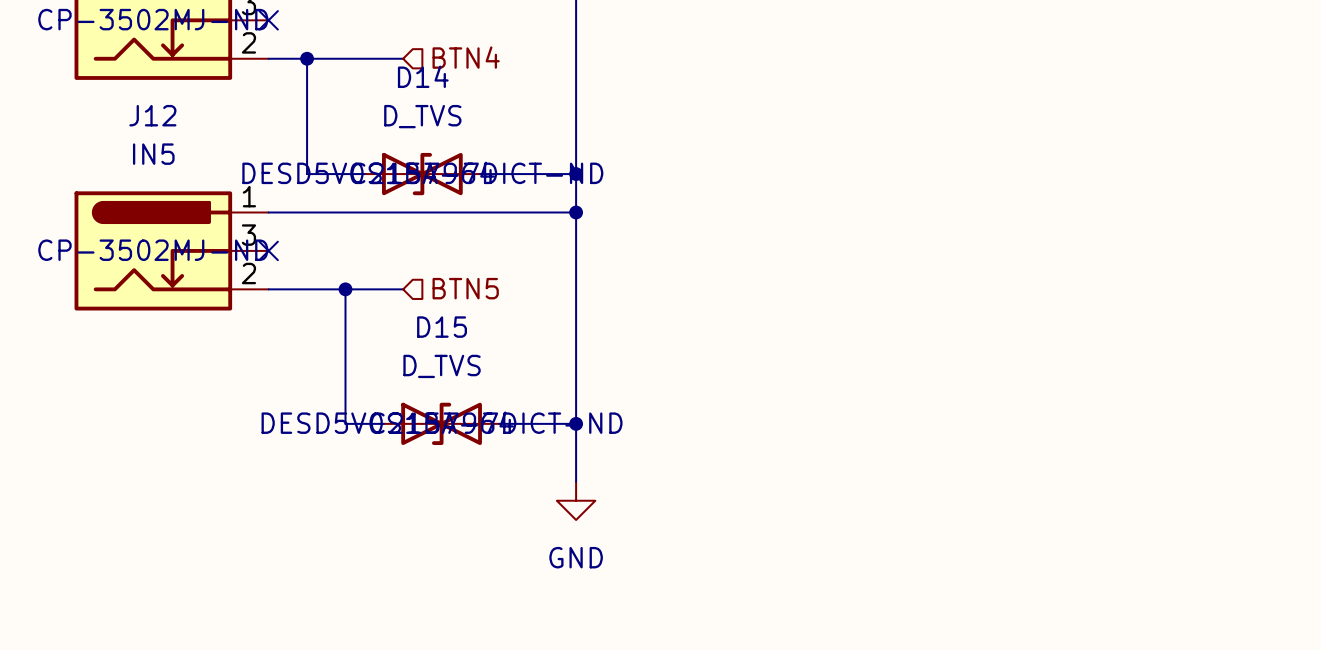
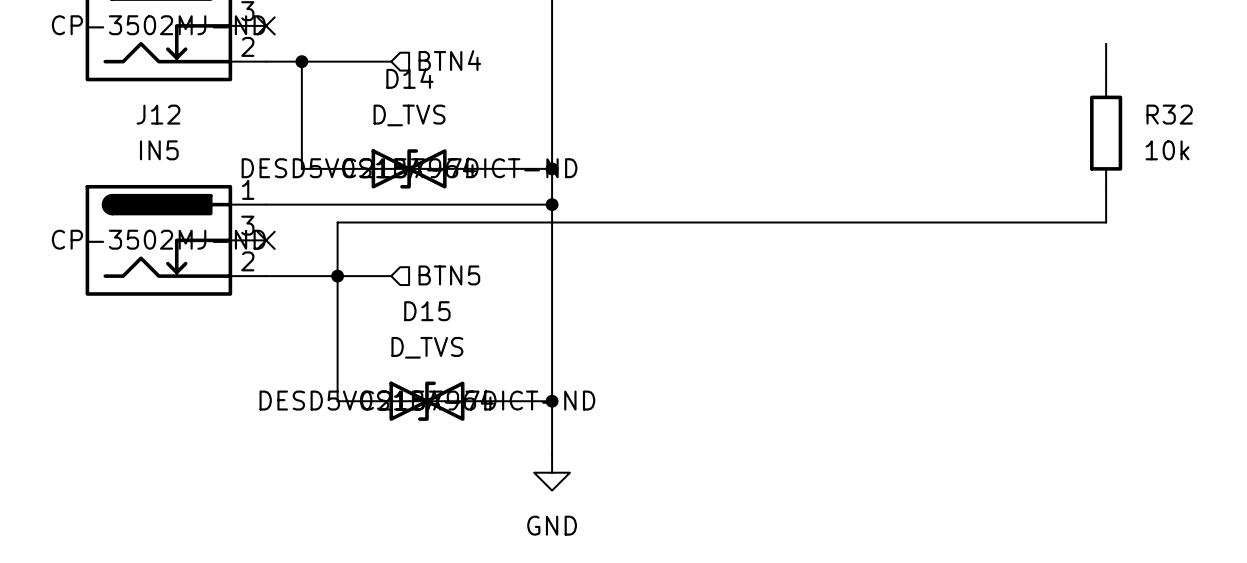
wire: none -> (1106, 43) (1106, 79)
R32: none -> 10k (1106, 133)
wire: none -> (1106, 186) (1106, 222) (337, 222) (337, 276)

